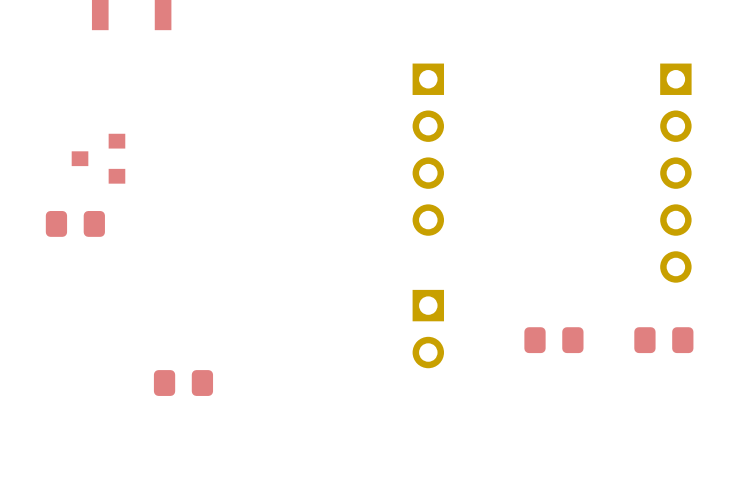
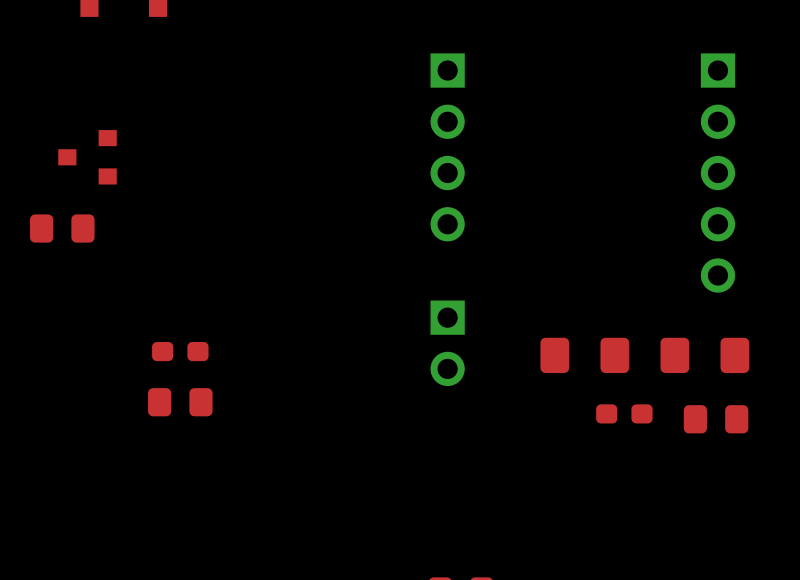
part footprint: [524, 327, 584, 354] -> [540, 337, 630, 374]
part footprint: [634, 327, 694, 354] -> [660, 337, 750, 374]
part: none -> (180, 351)
part: none -> (624, 413)
part: none -> (716, 419)

